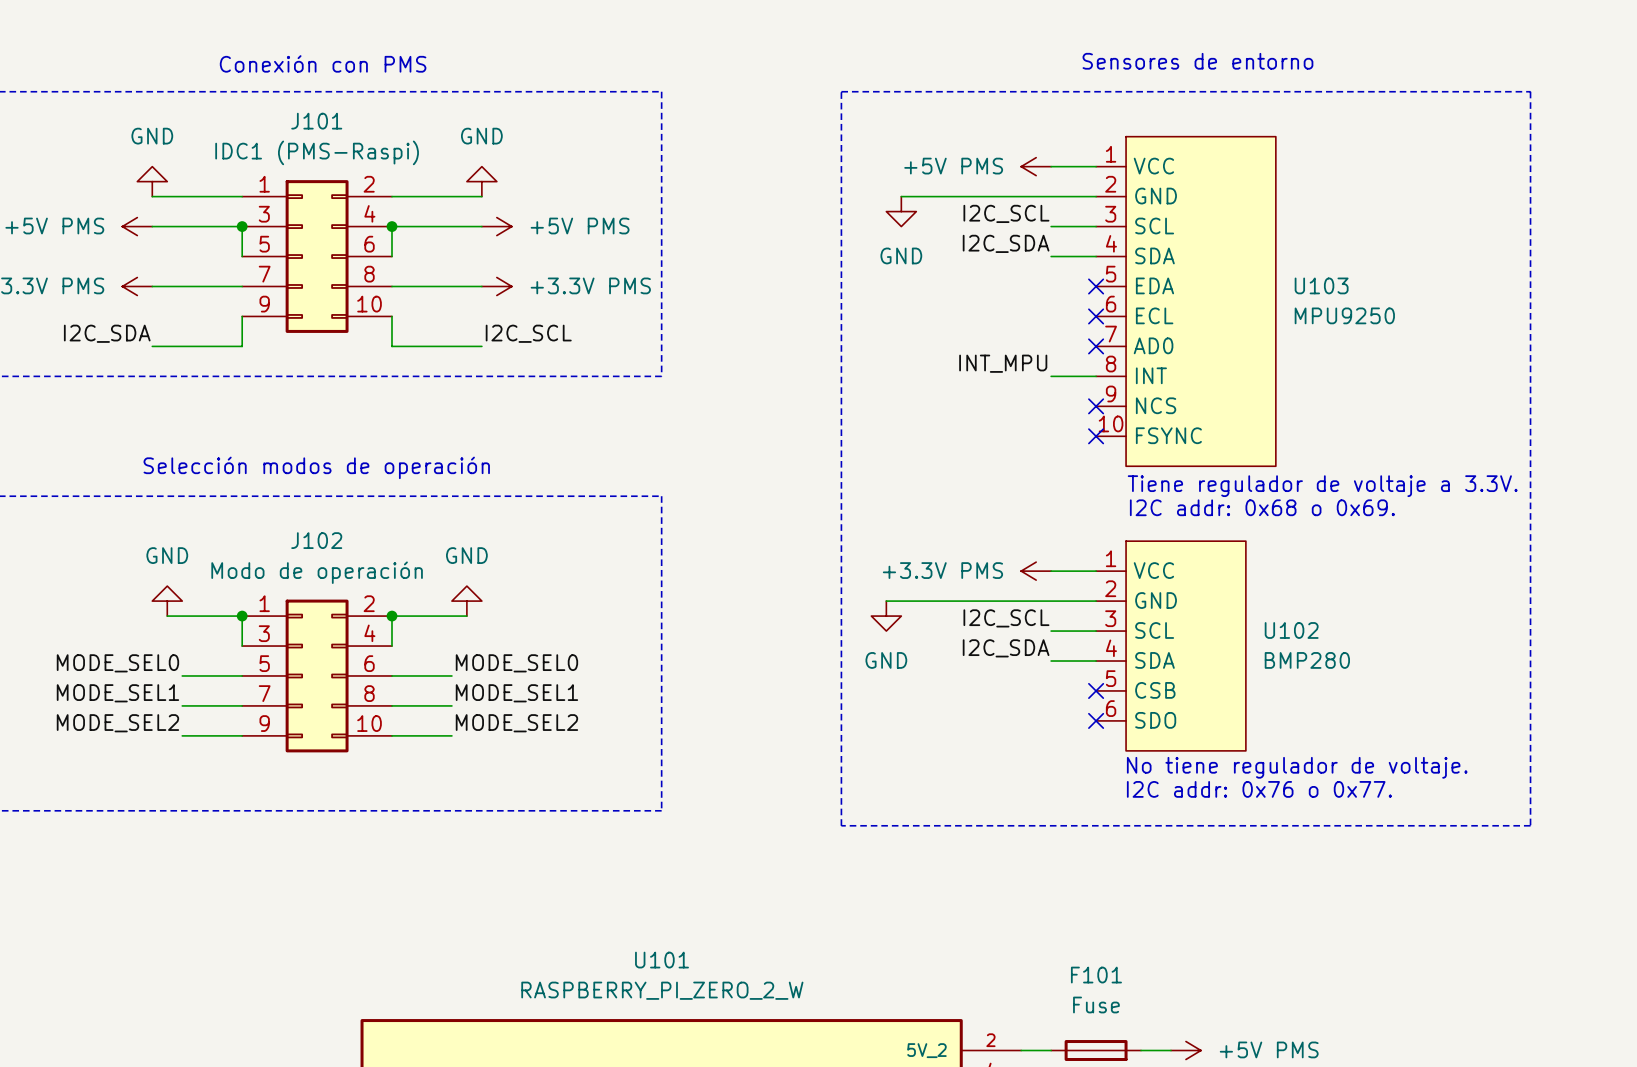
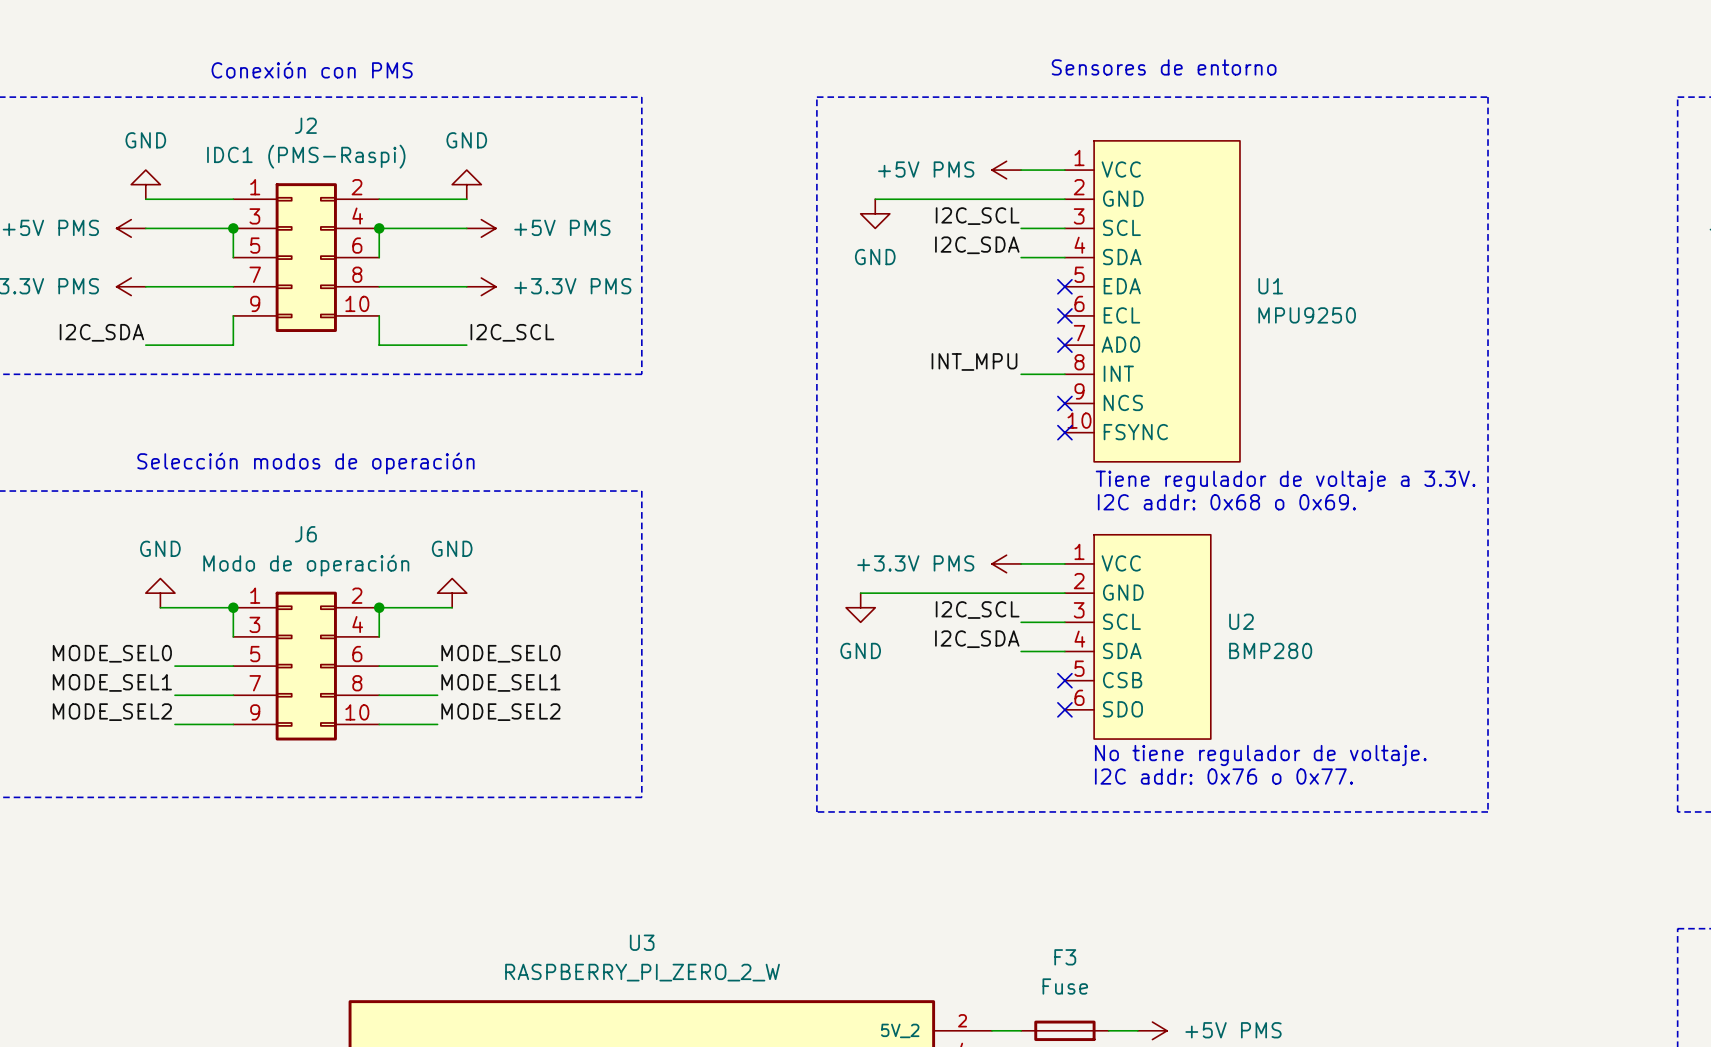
J101 name: J101 (316, 121) -> J2 (305, 125)
U103 name: U103 (1321, 285) -> U1 (1270, 286)
J102 name: J102 (316, 540) -> J6 (305, 534)
U102 name: U102 (1291, 630) -> U2 (1241, 621)
U101 name: U101 (662, 960) -> U3 (642, 942)
F101 name: F101 (1096, 975) -> F3 (1065, 957)

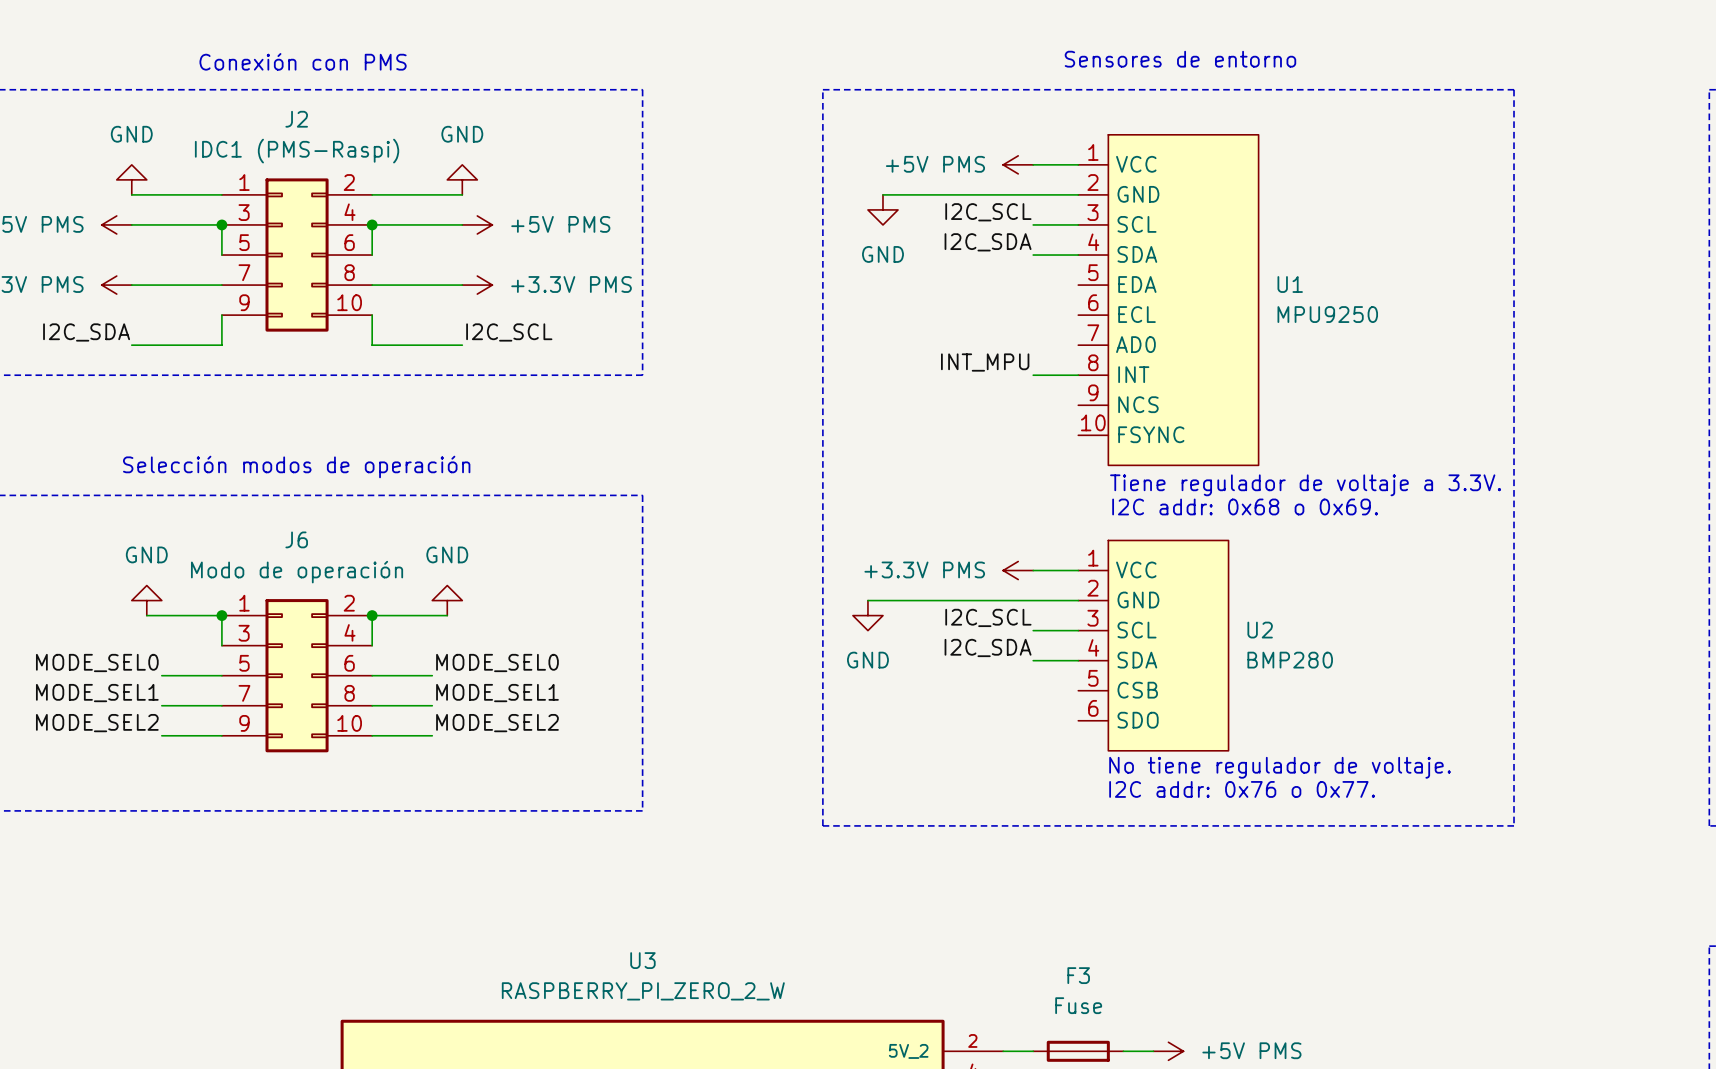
no-connect mark: (1064, 286) -> none
no-connect mark: (1064, 315) -> none
no-connect mark: (1064, 345) -> none
no-connect mark: (1064, 403) -> none
no-connect mark: (1064, 432) -> none
no-connect mark: (1064, 680) -> none
no-connect mark: (1064, 709) -> none

